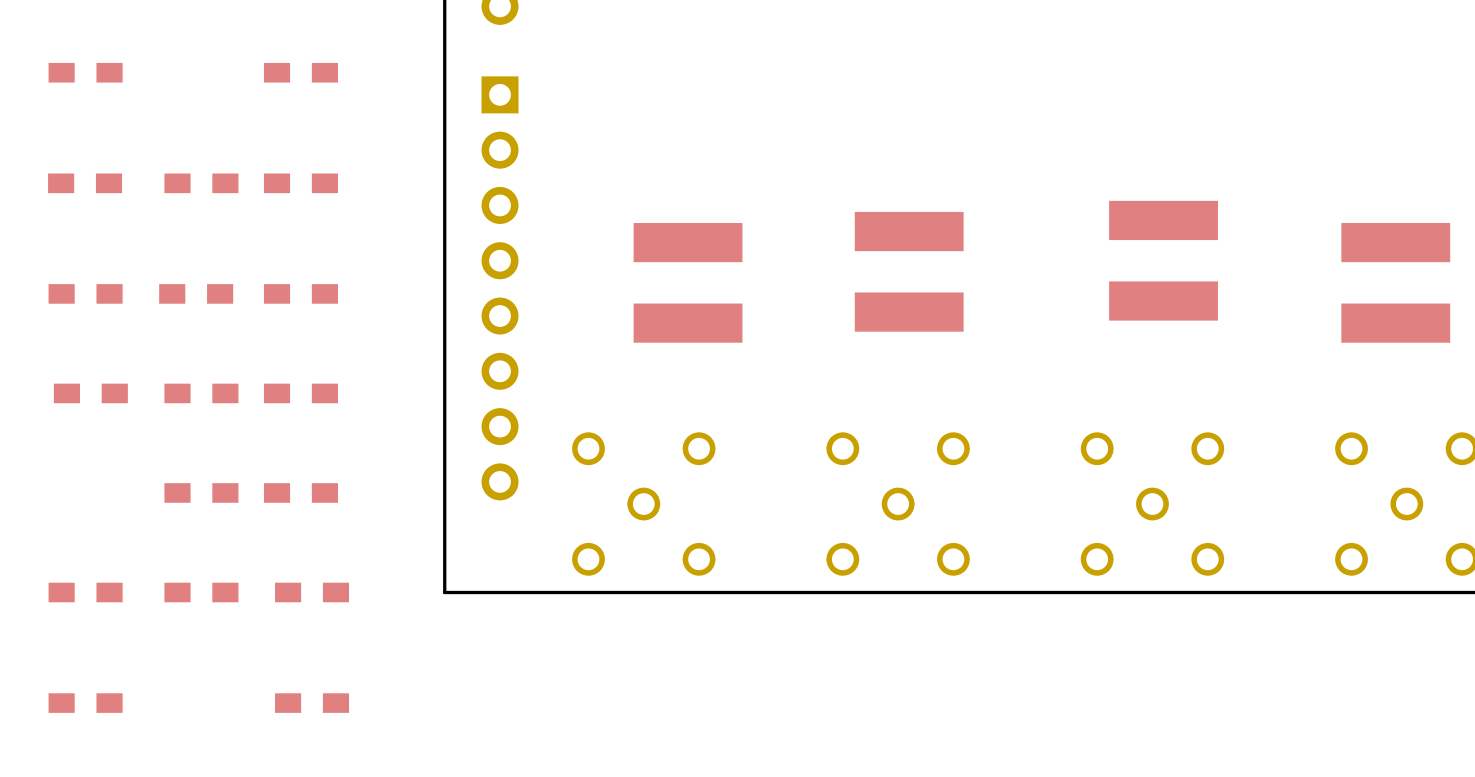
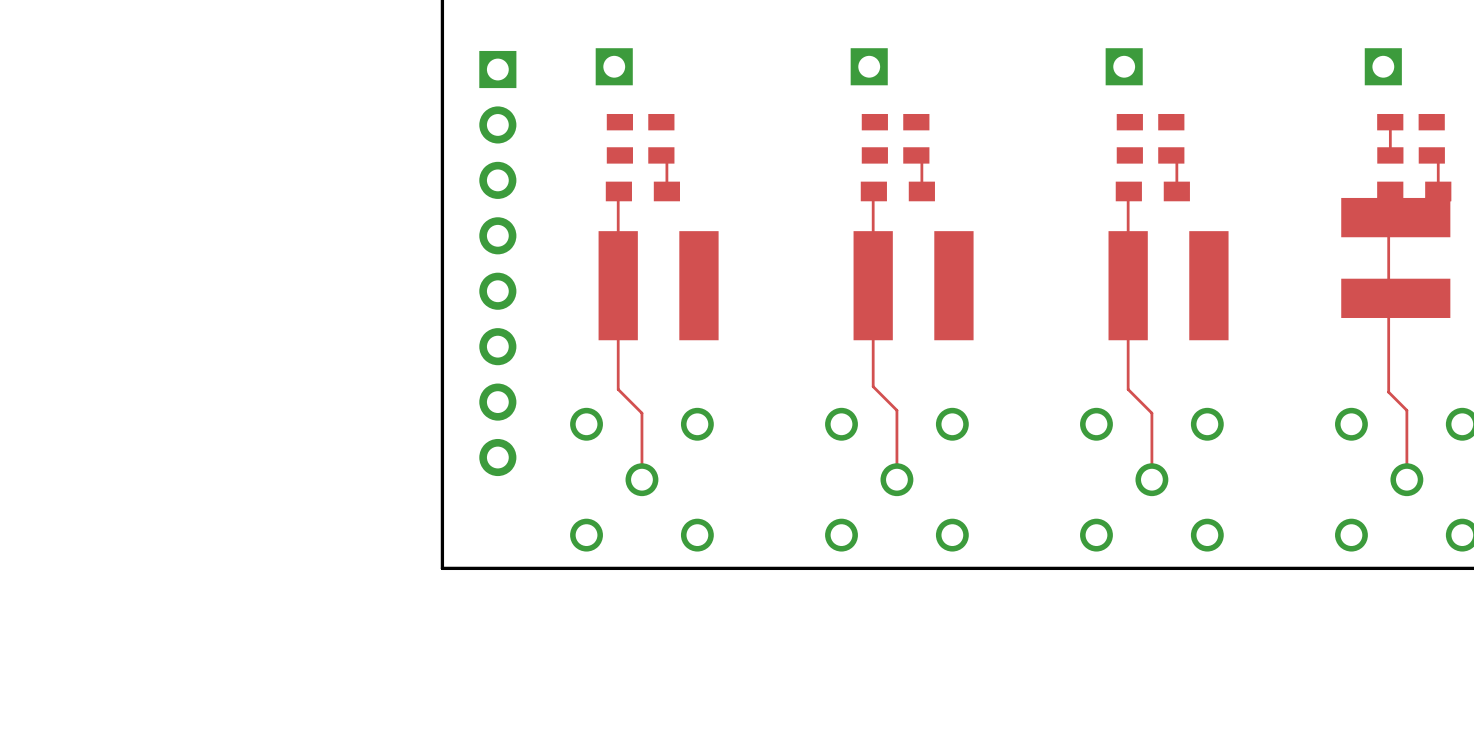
part: (85, 72) -> none
part: (300, 72) -> none
part: none -> (614, 66)
part: none -> (869, 66)
part: none -> (1124, 66)
part: none -> (1383, 66)
part: none -> (640, 122)
part: none -> (895, 122)
part: none -> (1150, 122)
top track: none -> (1390, 122) (1390, 155)
part: none -> (1410, 122)
part: none -> (640, 155)
top track: none -> (661, 155) (666, 160) (666, 191)
part: none -> (895, 155)
top track: none -> (916, 155) (921, 160) (921, 191)
part: none -> (1150, 155)
top track: none -> (1171, 155) (1176, 160) (1176, 191)
part: none -> (1411, 155)
top track: none -> (1431, 155) (1438, 161) (1438, 191)
part: (85, 183) -> none
part: (201, 183) -> none
part: (300, 183) -> none
top track: none -> (618, 191) (618, 389) (641, 413) (641, 479)
part: none -> (642, 191)
top track: none -> (873, 191) (873, 386) (896, 410) (896, 479)
part: none -> (897, 191)
top track: none -> (1128, 191) (1128, 389) (1151, 413) (1151, 479)
part: none -> (1152, 191)
top track: none -> (1390, 191) (1388, 193) (1388, 392) (1406, 410) (1406, 479)
part: none -> (1414, 191)
part rotation: 0° (1163, 260) -> 90° clockwise (1168, 285)
part rotation: 0° (909, 271) -> 90° clockwise (913, 285)
part rotation: 0° (688, 282) -> 90° clockwise (658, 285)
part: (85, 293) -> none
part: (196, 293) -> none
part: (300, 293) -> none
part: (90, 393) -> none
part: (201, 393) -> none
part: (300, 393) -> none
part: (201, 492) -> none
part: (300, 492) -> none
part: (85, 592) -> none
part: (201, 592) -> none
part: (312, 592) -> none
part: (85, 703) -> none
part: (312, 703) -> none

